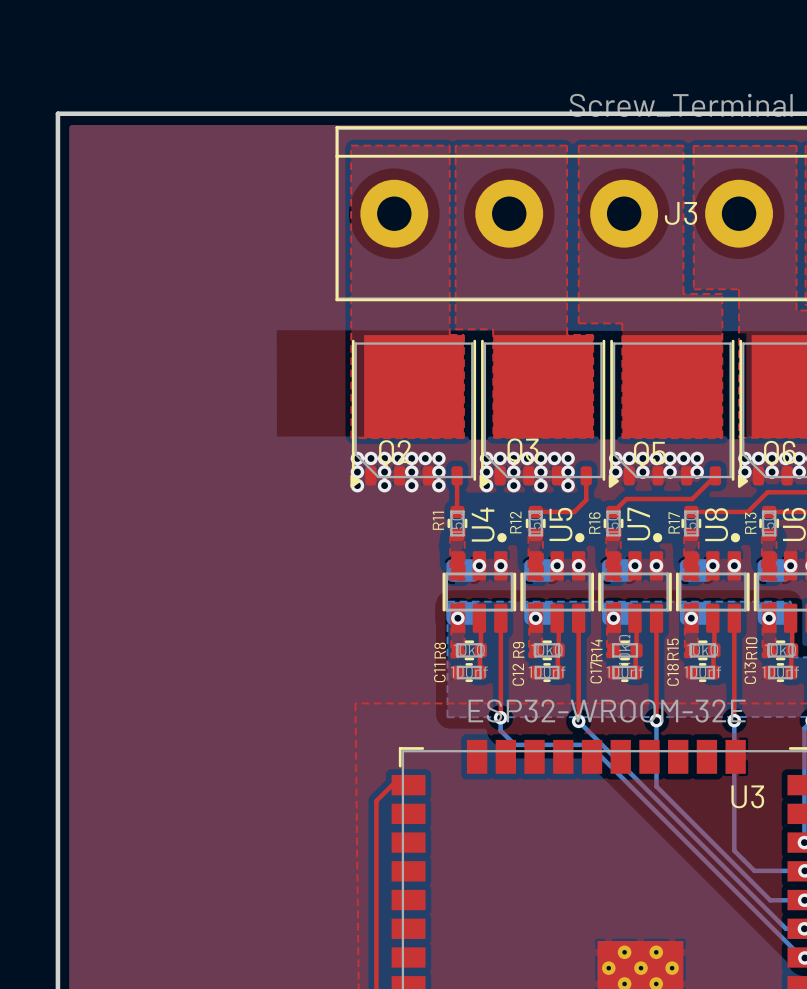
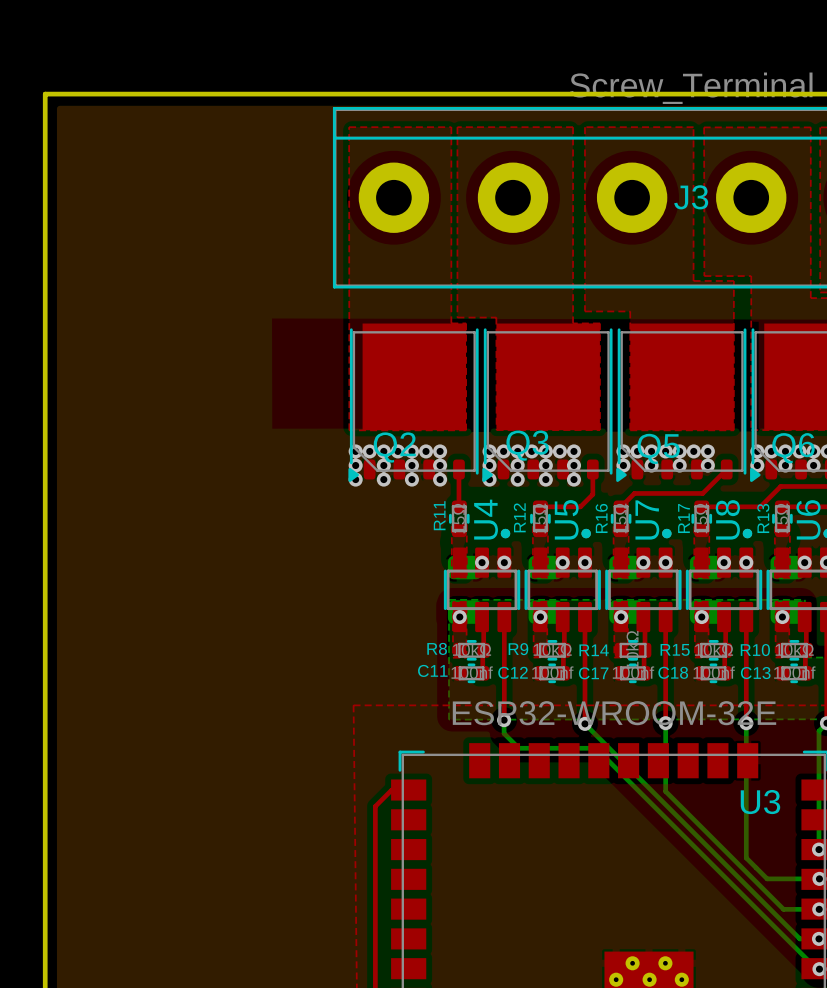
R10 name rotation: 0° (751, 648) -> 90° clockwise (755, 650)
R9 name rotation: 0° (518, 649) -> 90° clockwise (518, 649)
R15 name rotation: 0° (673, 649) -> 90° clockwise (675, 649)
R8 name rotation: 0° (440, 650) -> 90° clockwise (437, 648)
R14 name rotation: 0° (596, 650) -> 90° clockwise (594, 650)
C11 name rotation: 0° (439, 672) -> 90° clockwise (432, 670)
C17 name rotation: 0° (596, 672) -> 90° clockwise (593, 673)
C13 name rotation: 0° (750, 673) -> 90° clockwise (755, 673)
C12 name rotation: 0° (518, 674) -> 90° clockwise (513, 672)
C18 name rotation: 0° (673, 674) -> 90° clockwise (673, 672)

